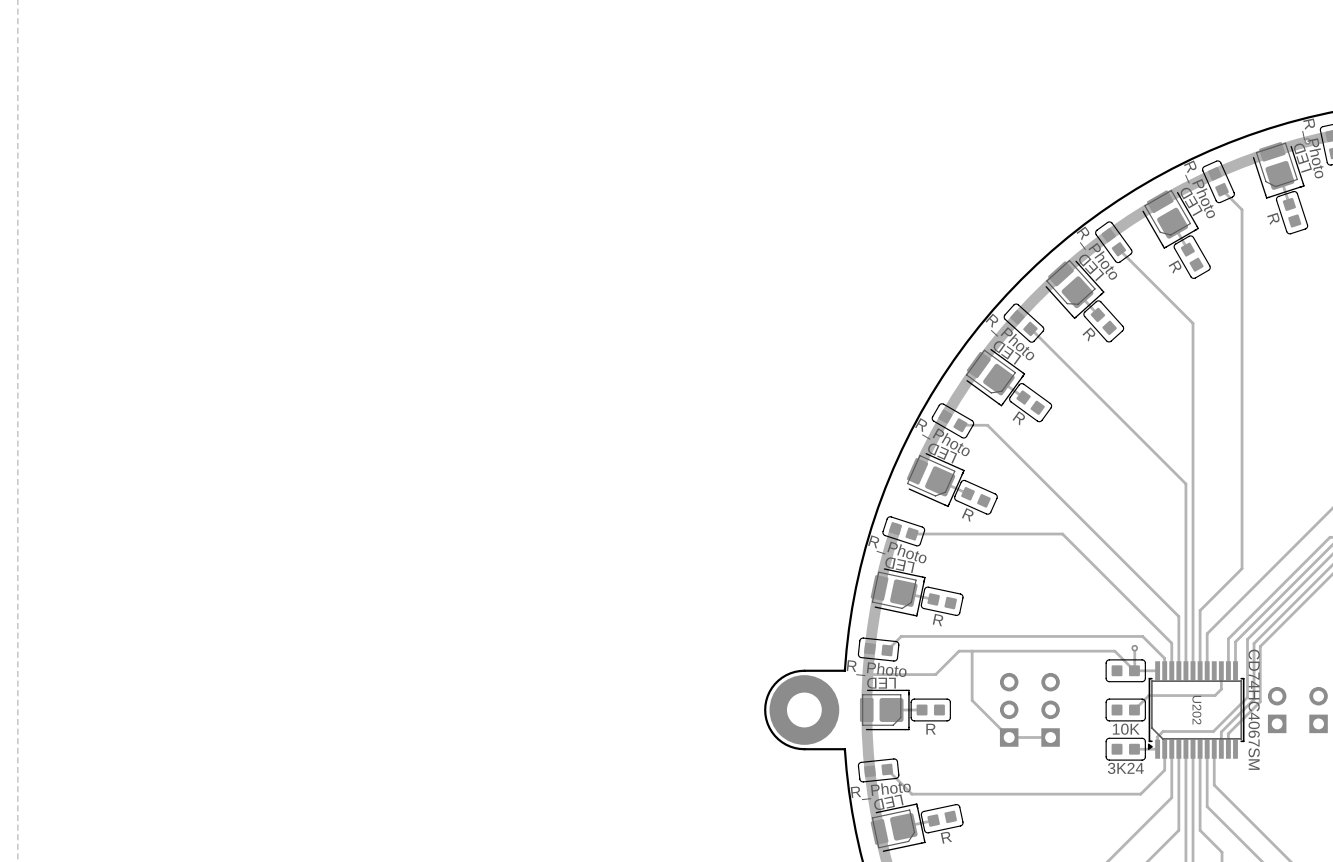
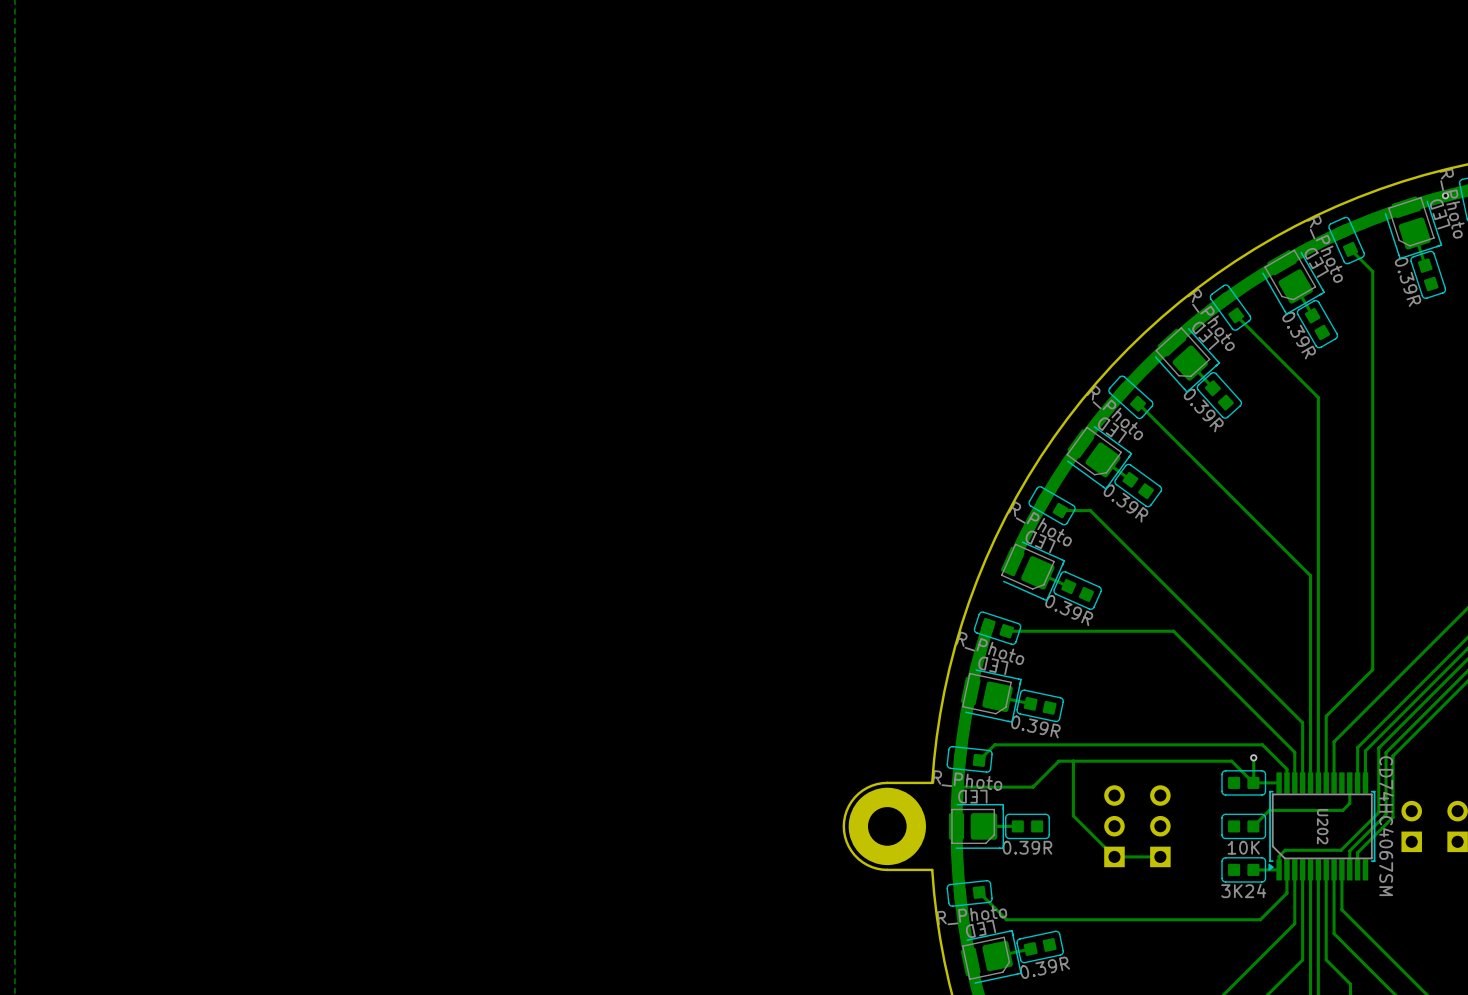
part value: R (1273, 218) -> 0.39R (1408, 282)
part value: R (1175, 267) -> 0.39R (1299, 335)
part value: R (1088, 334) -> 0.39R (1203, 410)
part value: R (1018, 418) -> 0.39R (1125, 503)
part value: R (967, 514) -> 0.39R (1069, 610)
part value: R (938, 620) -> 0.39R (1035, 726)
part value: R (931, 729) -> 0.39R (1027, 847)
part value: R (946, 837) -> 0.39R (1045, 967)

